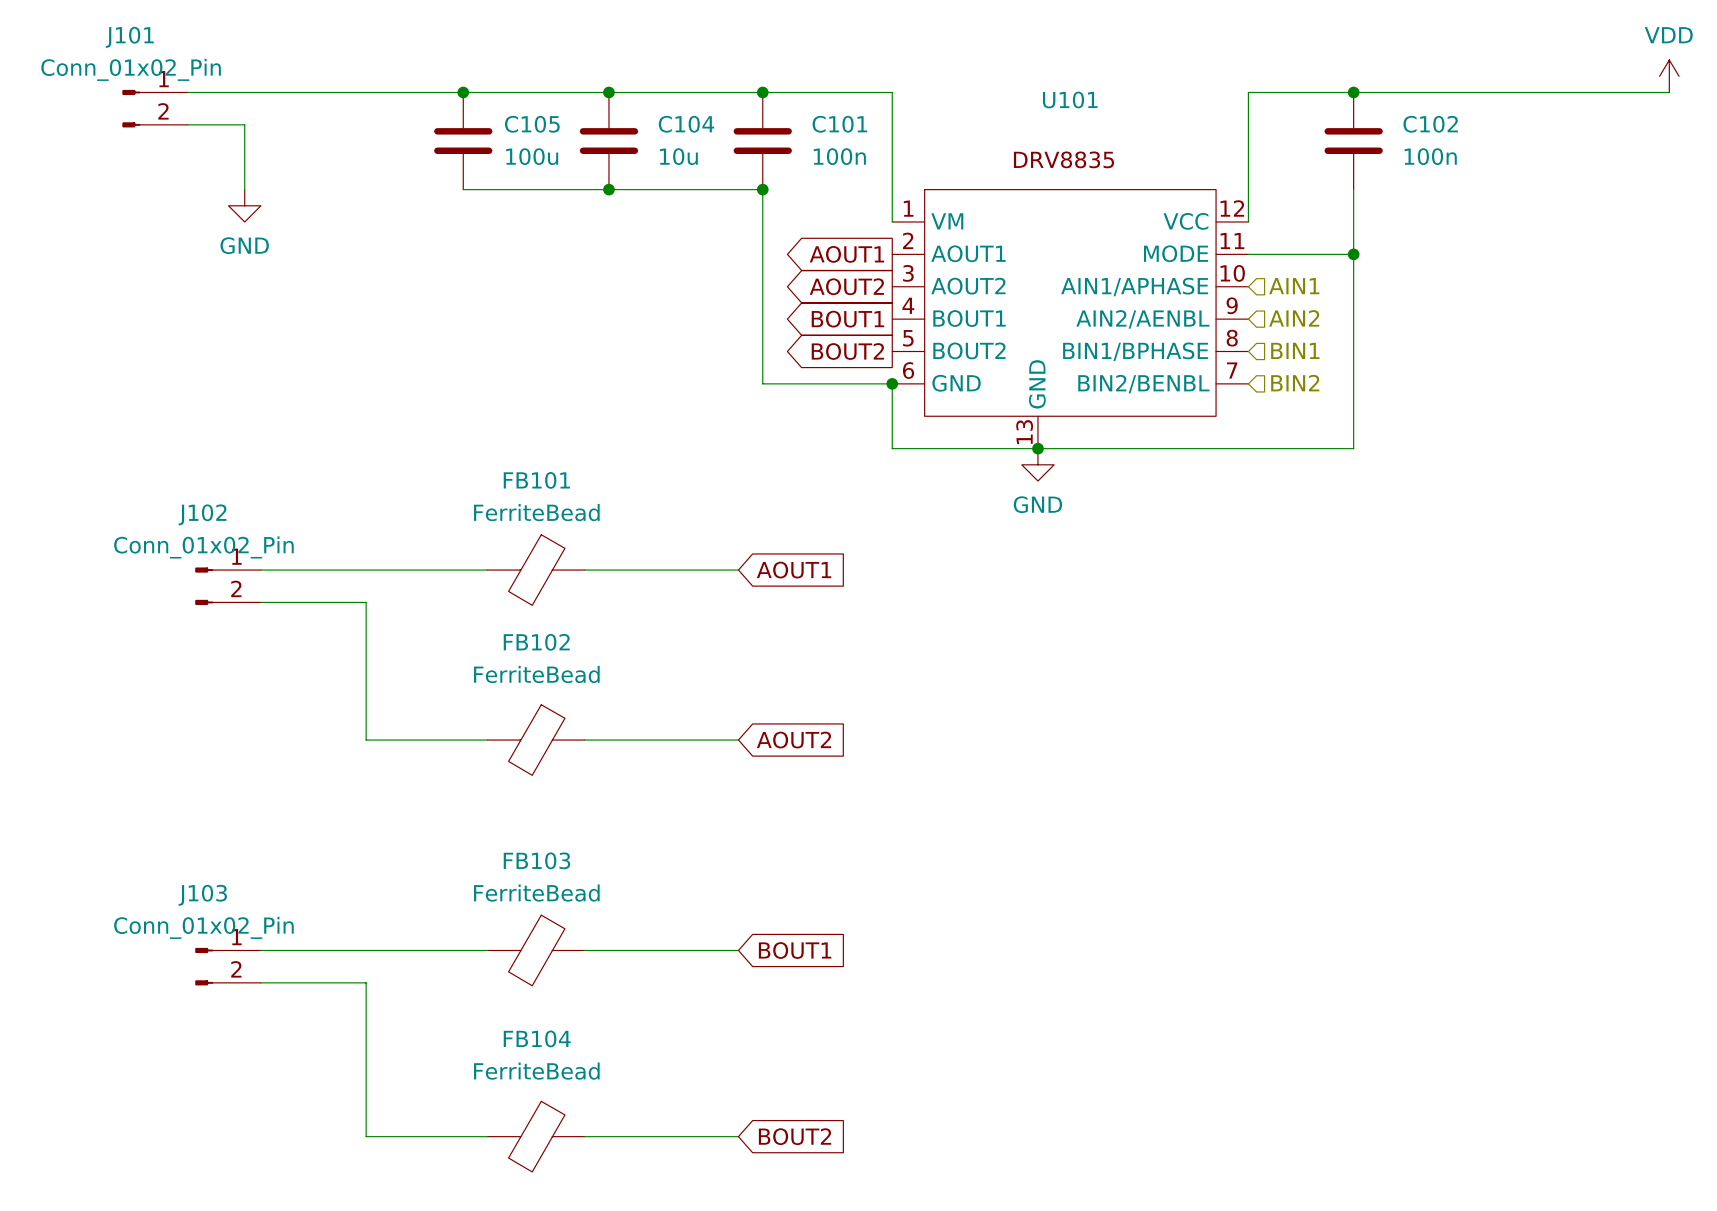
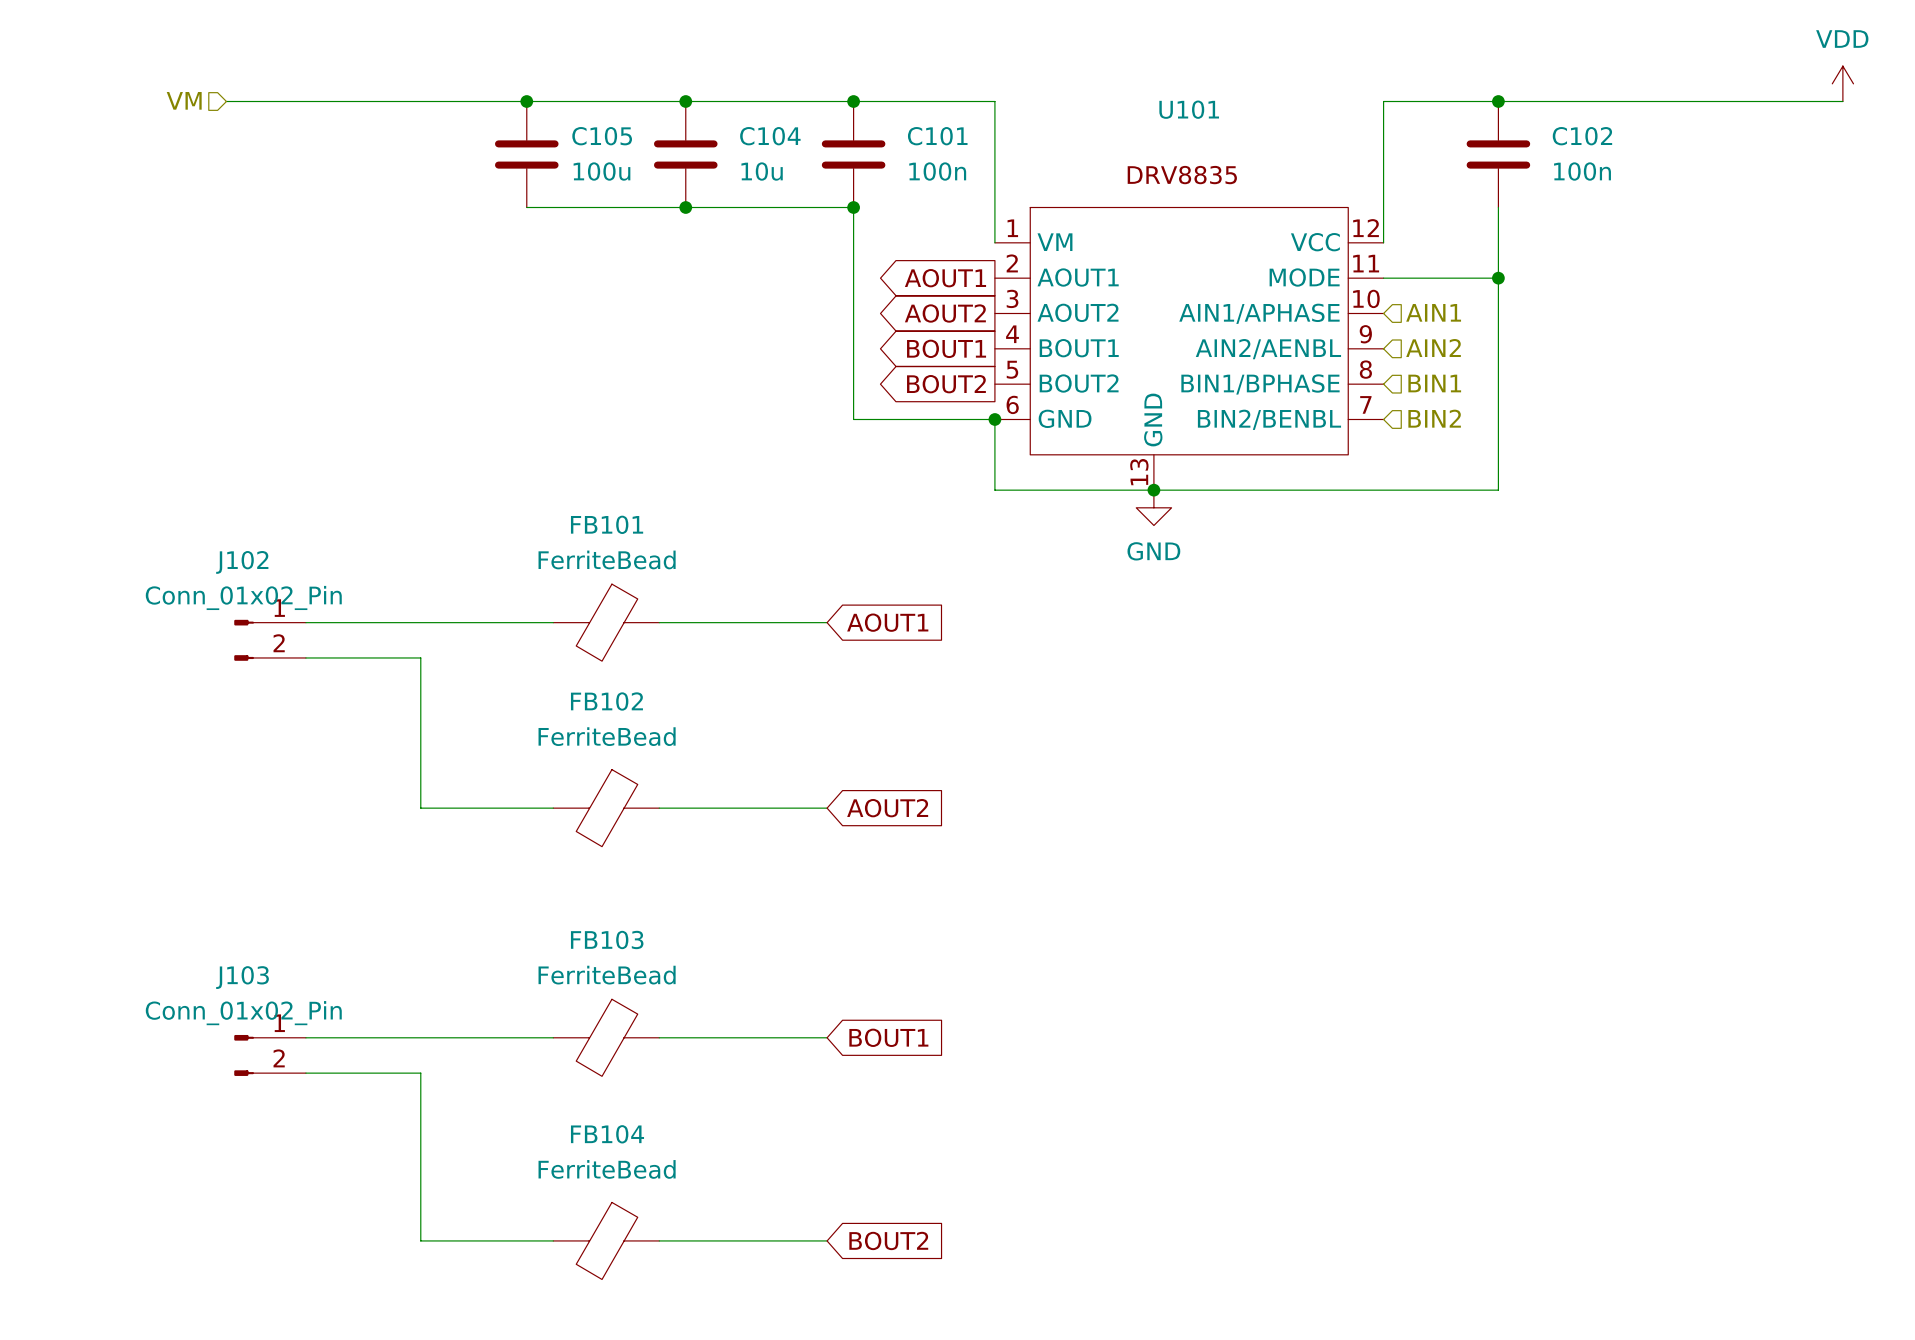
hierarchical label: none -> VM (184, 100)
J101: Conn_01x02_Pin (155, 108) -> none
wire: (188, 124) (244, 124) (244, 189) -> none
power symbol: GND (244, 205) -> none

